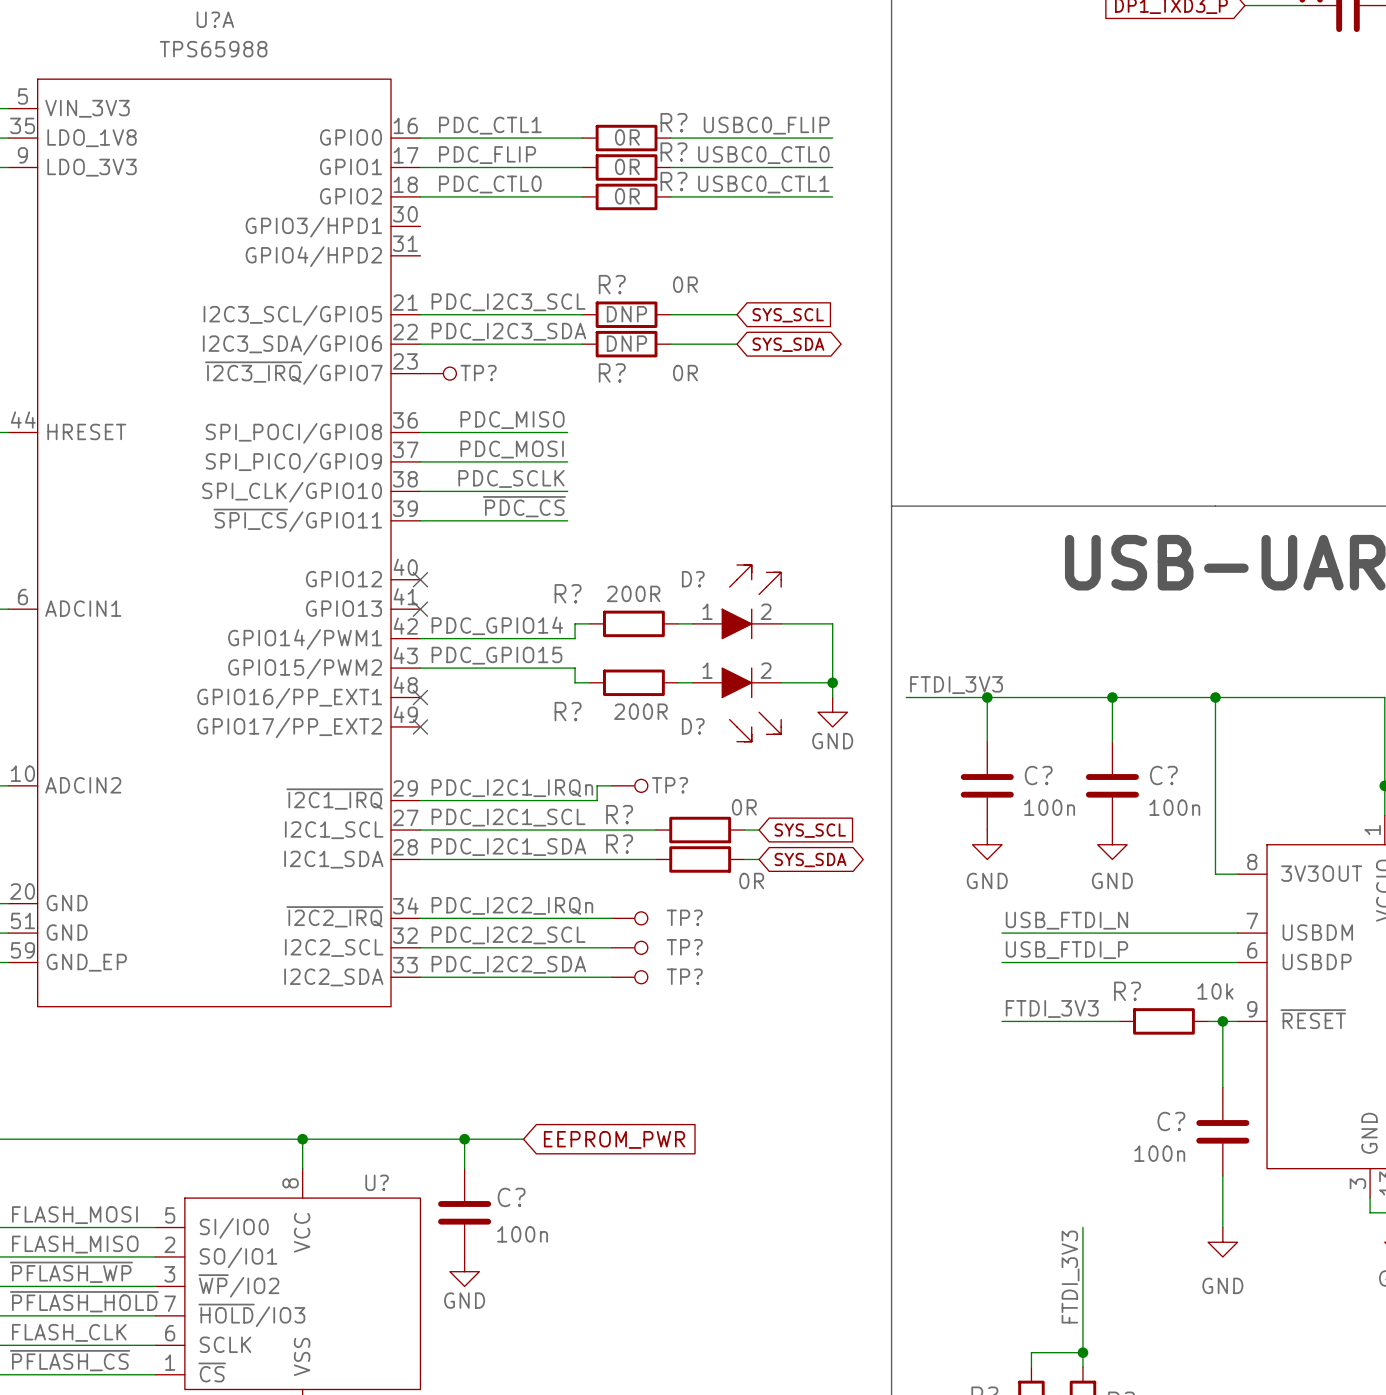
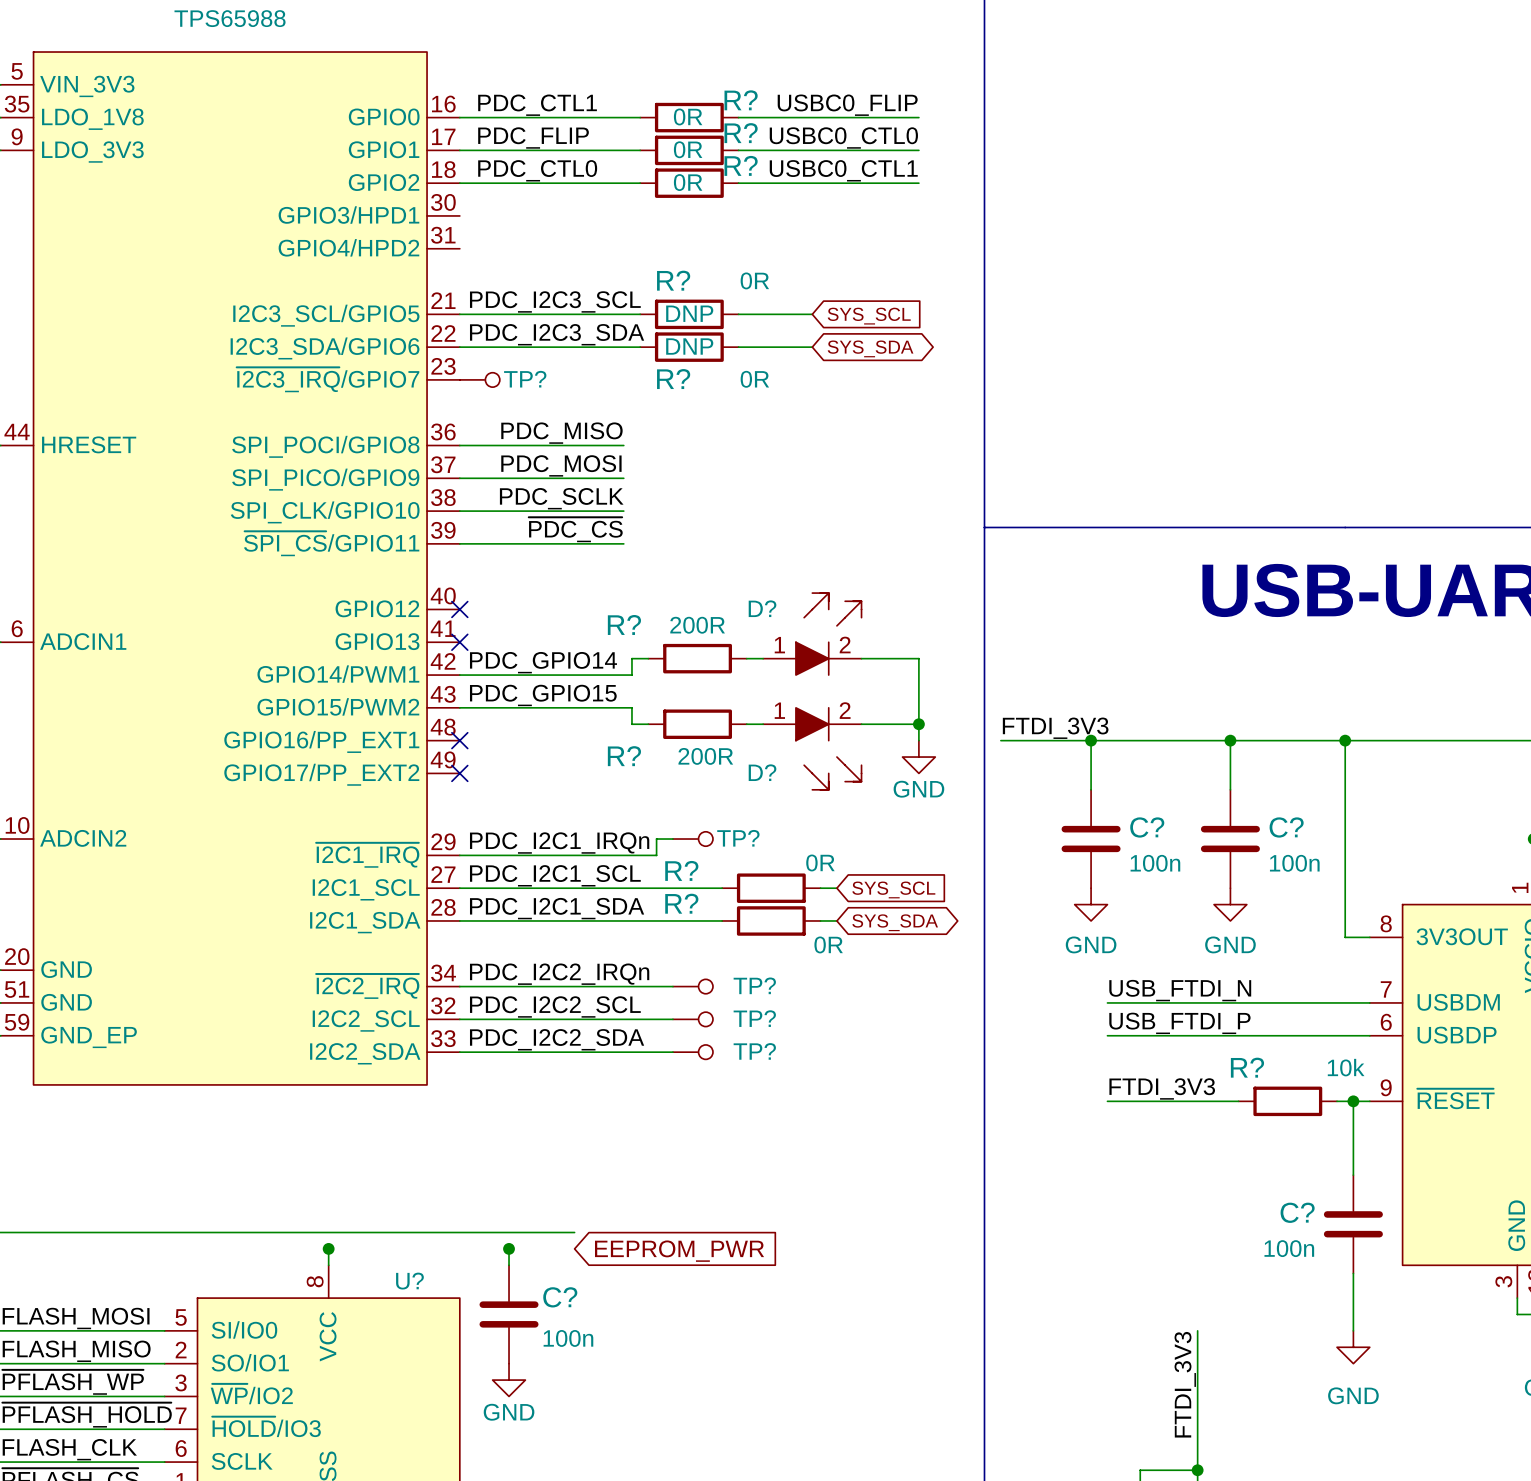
wire: (302, 1139) (302, 1153) -> none
junction position: (302, 1139) -> (328, 1248)
wire: (464, 1139) (464, 1153) -> none
junction position: (464, 1139) -> (509, 1248)
global label position: EEPROM_PWR (614, 1139) -> EEPROM_PWR (679, 1251)

